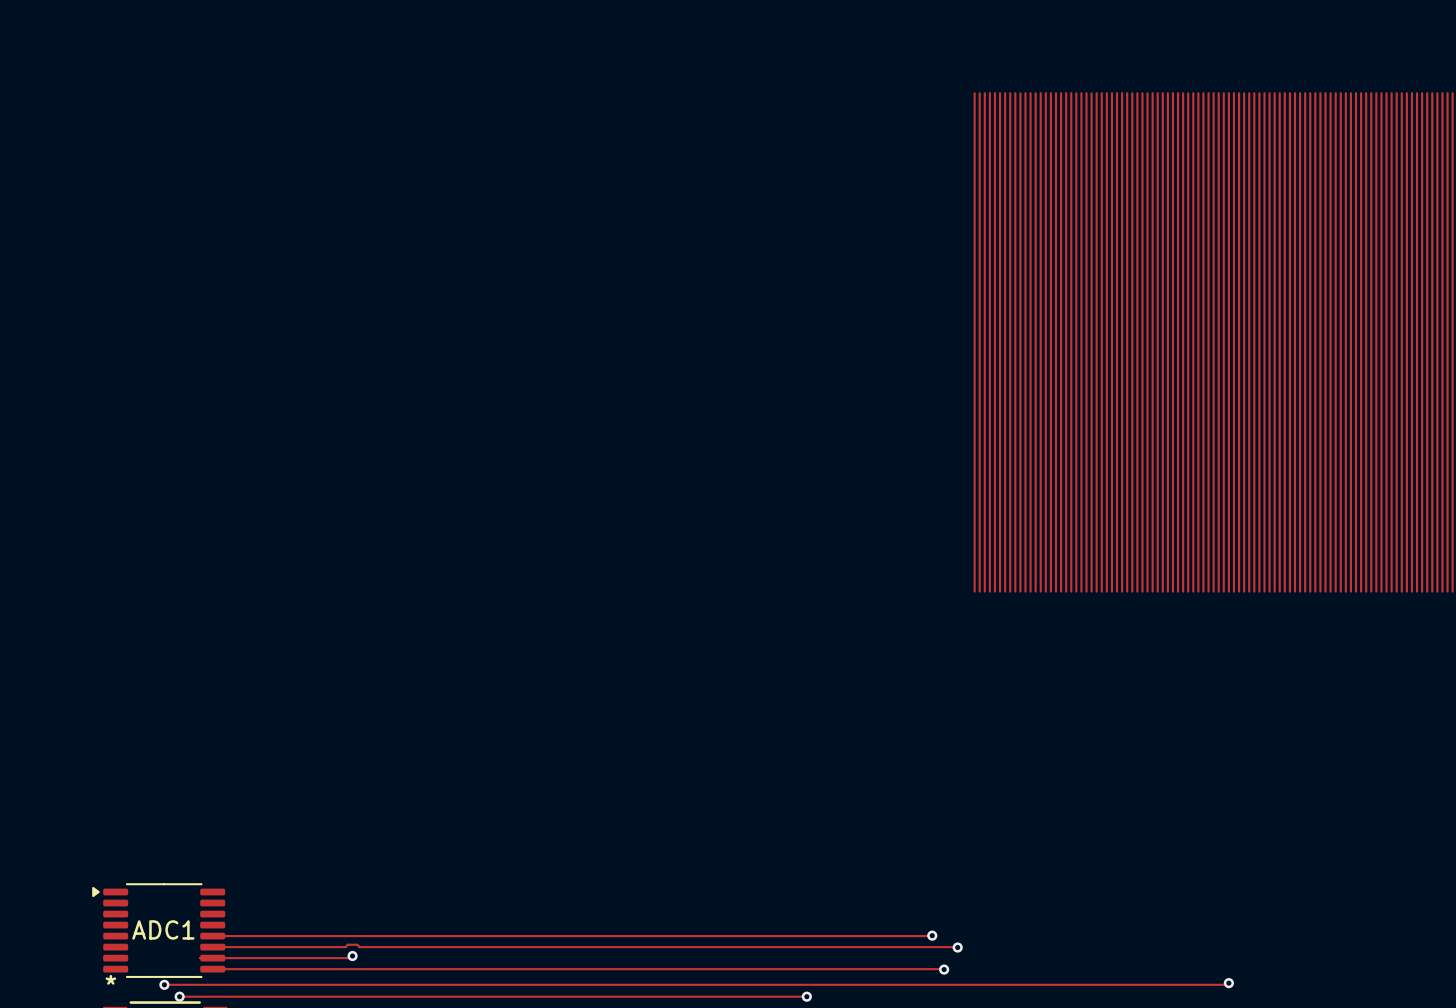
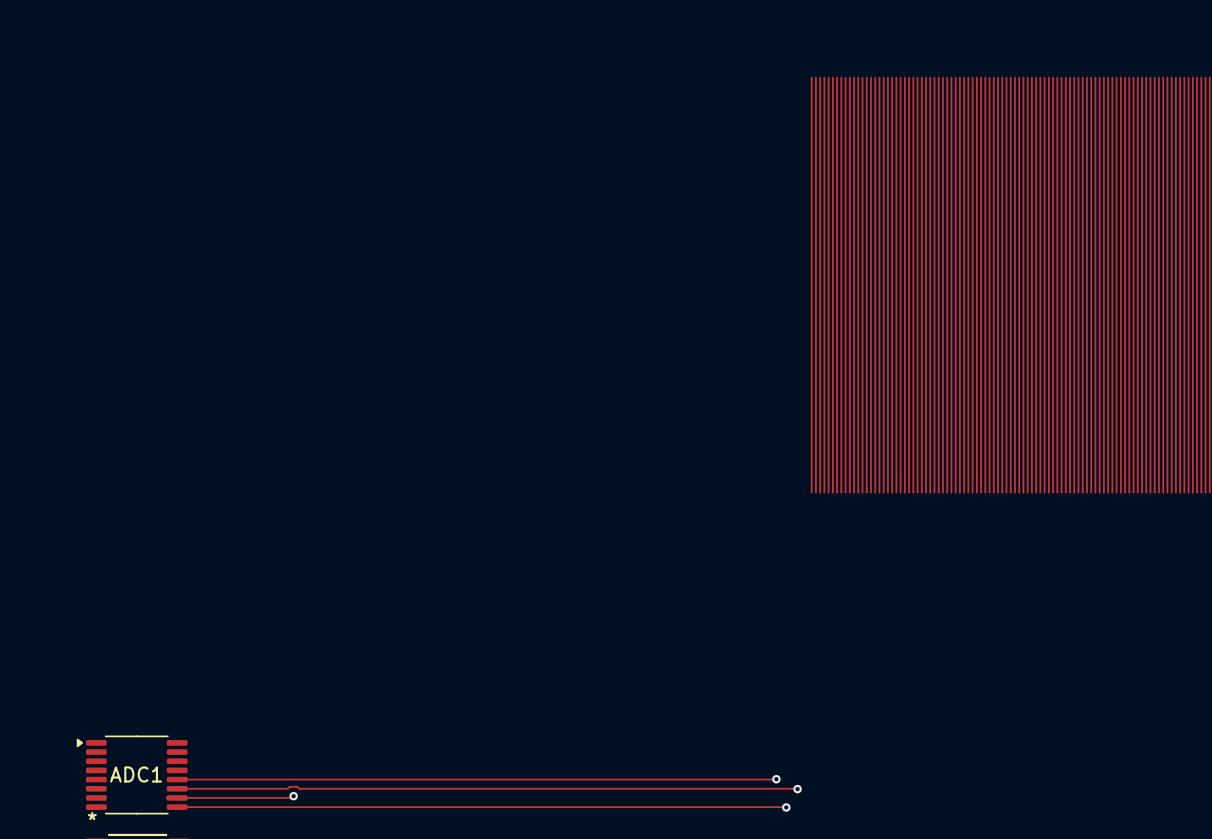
track: (1228, 983) (1227, 984) (164, 984) -> none
via: (1228, 983) -> none
via: (164, 984) -> none
track: (179, 996) (806, 996) -> none
via: (179, 996) -> none
via: (806, 996) -> none

